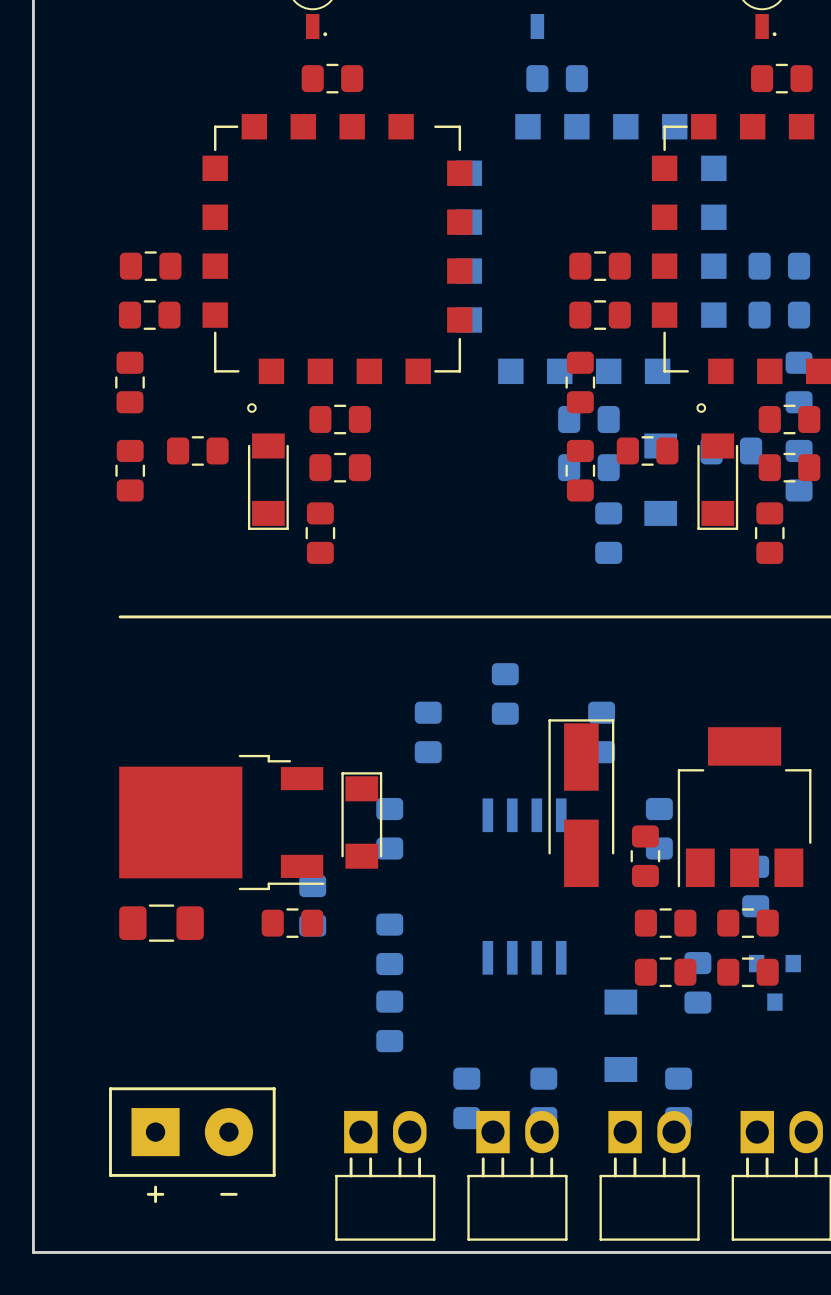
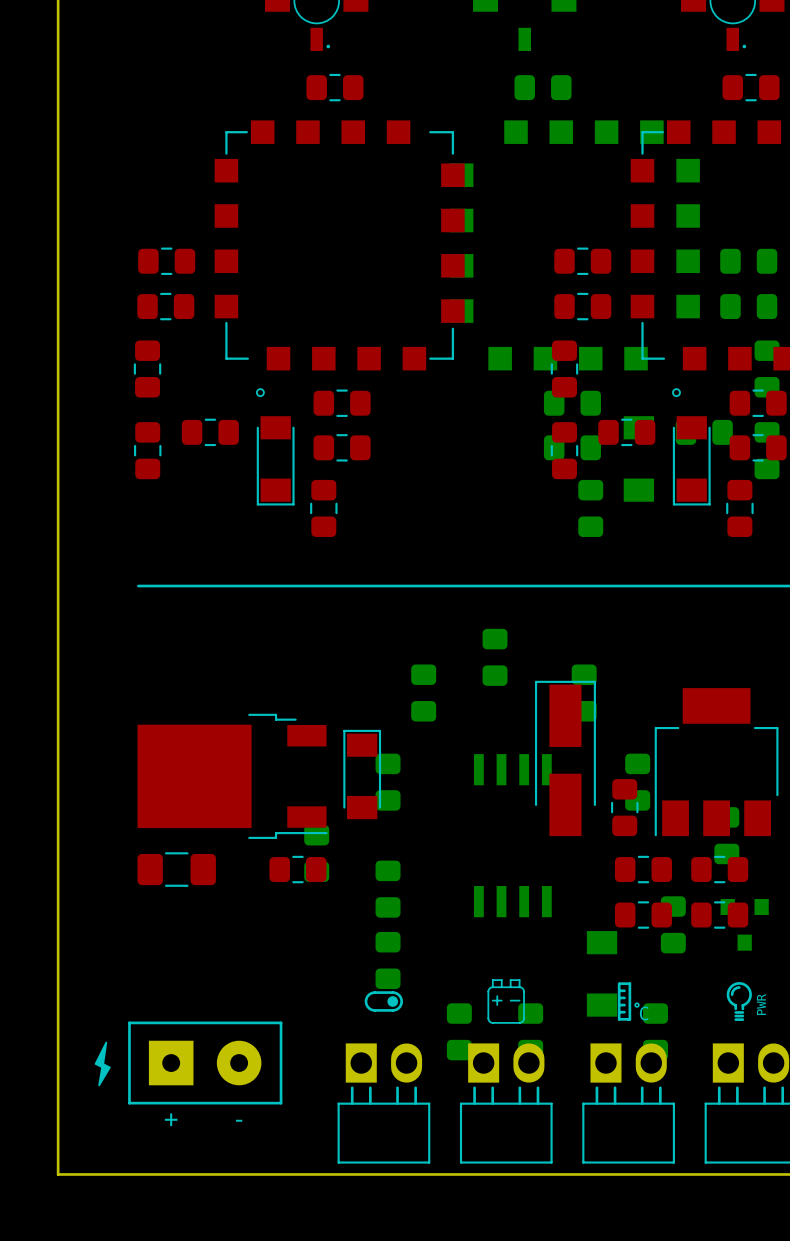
drawing: none -> [487, 979, 525, 1024]
drawing: none -> [617, 982, 640, 1021]
drawing: none -> [726, 982, 752, 1021]
drawing: none -> [364, 991, 404, 1012]
text: none -> PWR (761, 1004)
drawing: none -> [94, 1041, 111, 1087]

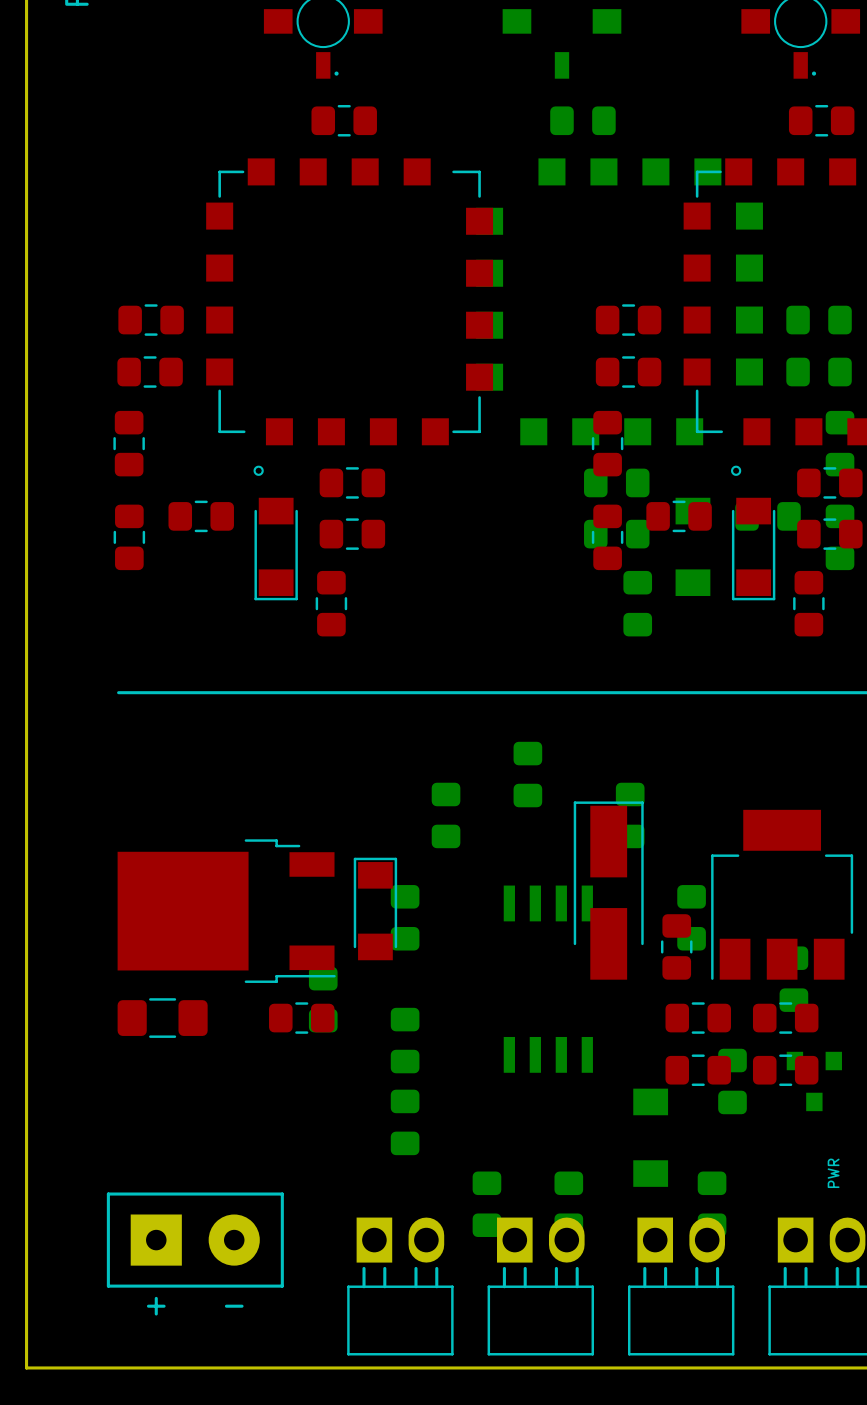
drawing: [487, 979, 525, 1024] -> none
drawing: [617, 982, 640, 1021] -> none
drawing: [726, 982, 752, 1021] -> none
drawing: [364, 991, 404, 1012] -> none
drawing: [94, 1041, 111, 1087] -> none

